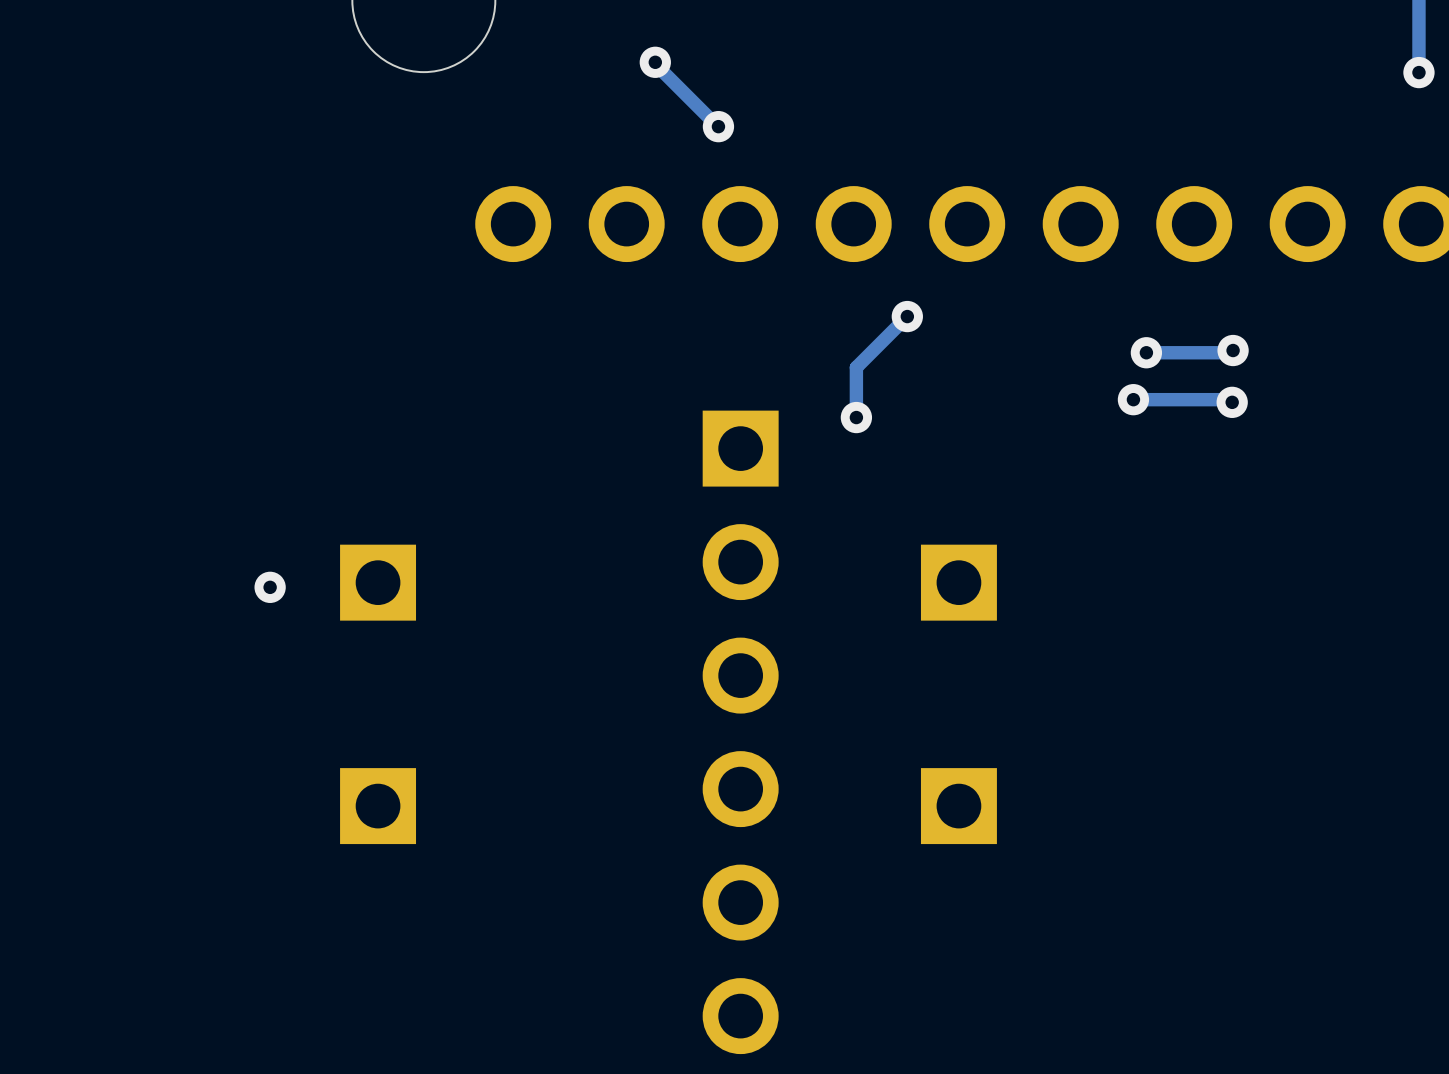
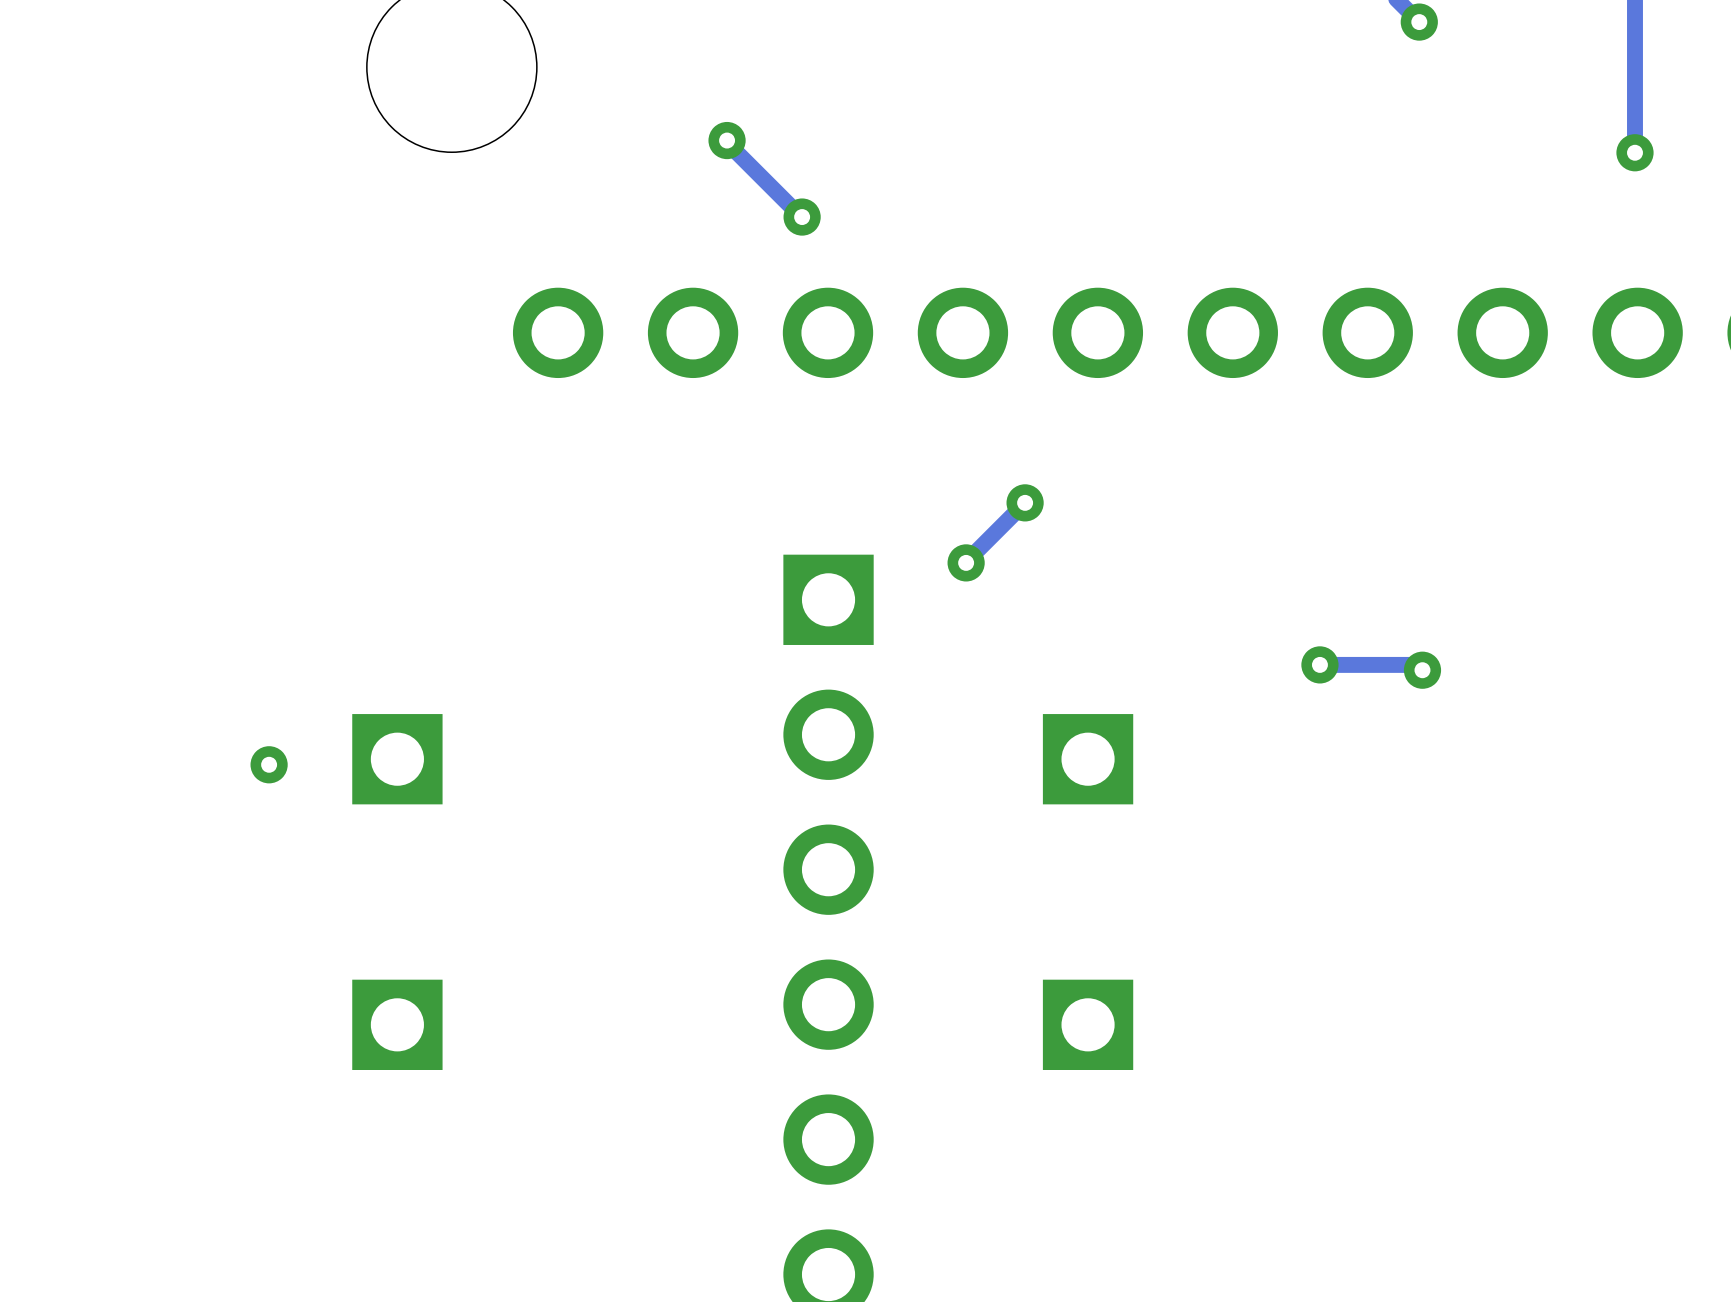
track: (907, 316) (856, 367) (856, 416) -> (1025, 502) (966, 561)
via position: (907, 316) -> (1025, 502)
track: (1233, 350) (1230, 352) (1146, 352) -> none
via: (1233, 350) -> none
via: (1146, 352) -> none
track: (1133, 399) (1229, 399) (1232, 402) -> none
via: (1133, 399) -> none
via: (1232, 402) -> none
track: none -> (1319, 664) (1417, 664) (1422, 670)
via: none -> (1319, 664)
via: none -> (1422, 670)

